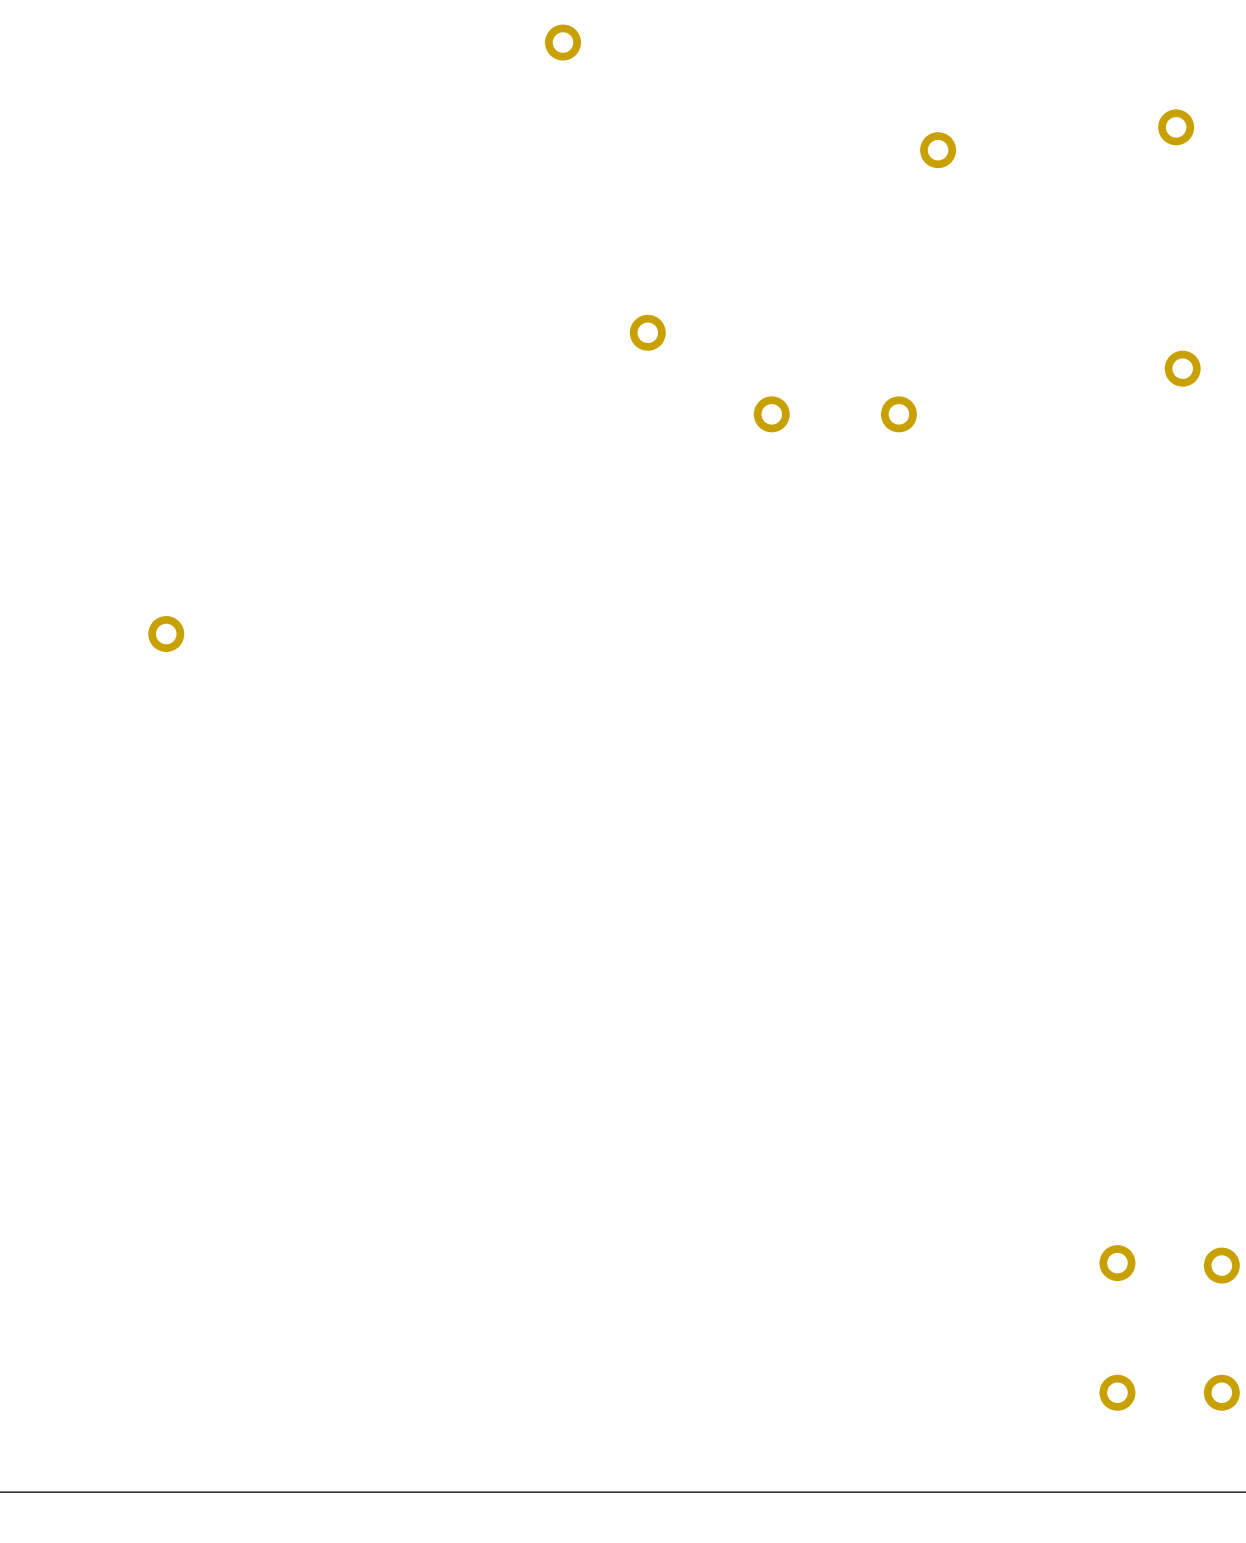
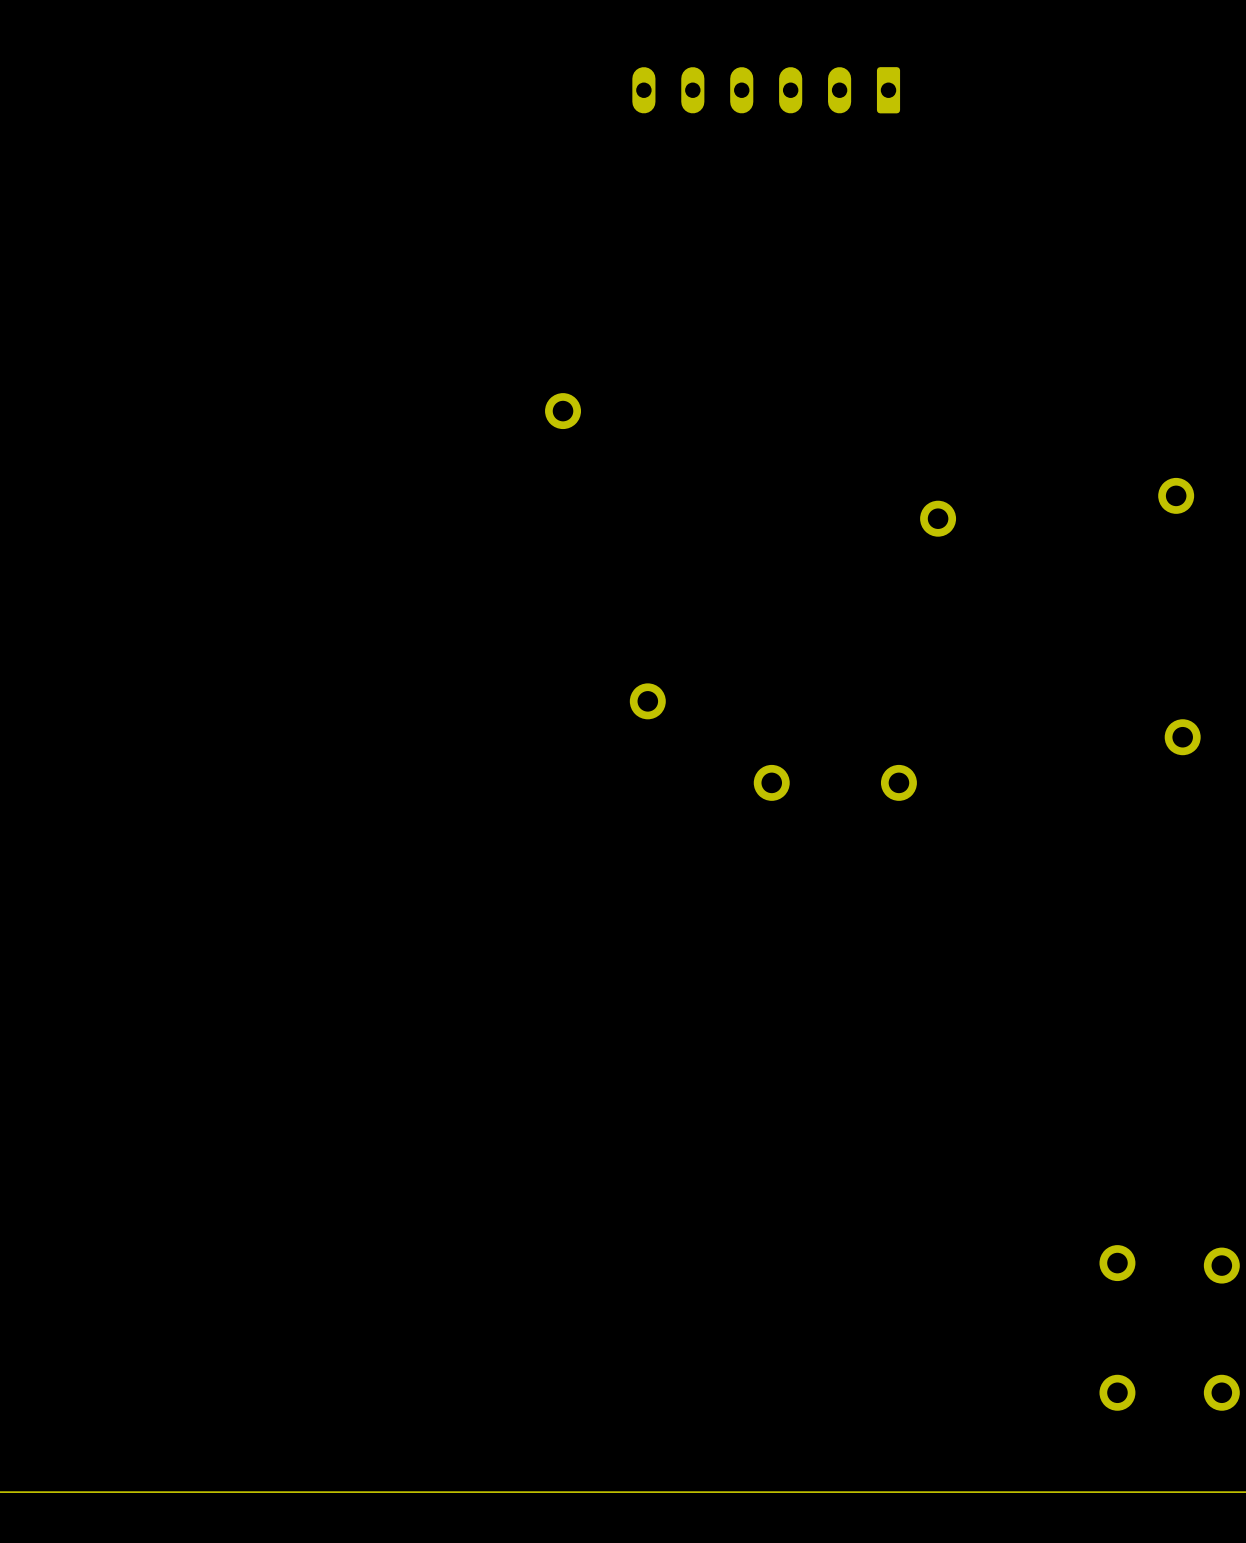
part: (563, 42) -> none
part: none -> (766, 90)
part: (1176, 127) -> none
part: (938, 150) -> none
part: (647, 332) -> none
part: (1182, 368) -> none
part: none -> (563, 411)
part: (771, 414) -> none
part: (898, 414) -> none
part: none -> (1176, 495)
part: none -> (938, 518)
part: (166, 634) -> none
part: none -> (647, 701)
part: none -> (1182, 737)
part: none -> (771, 782)
part: none -> (898, 782)

